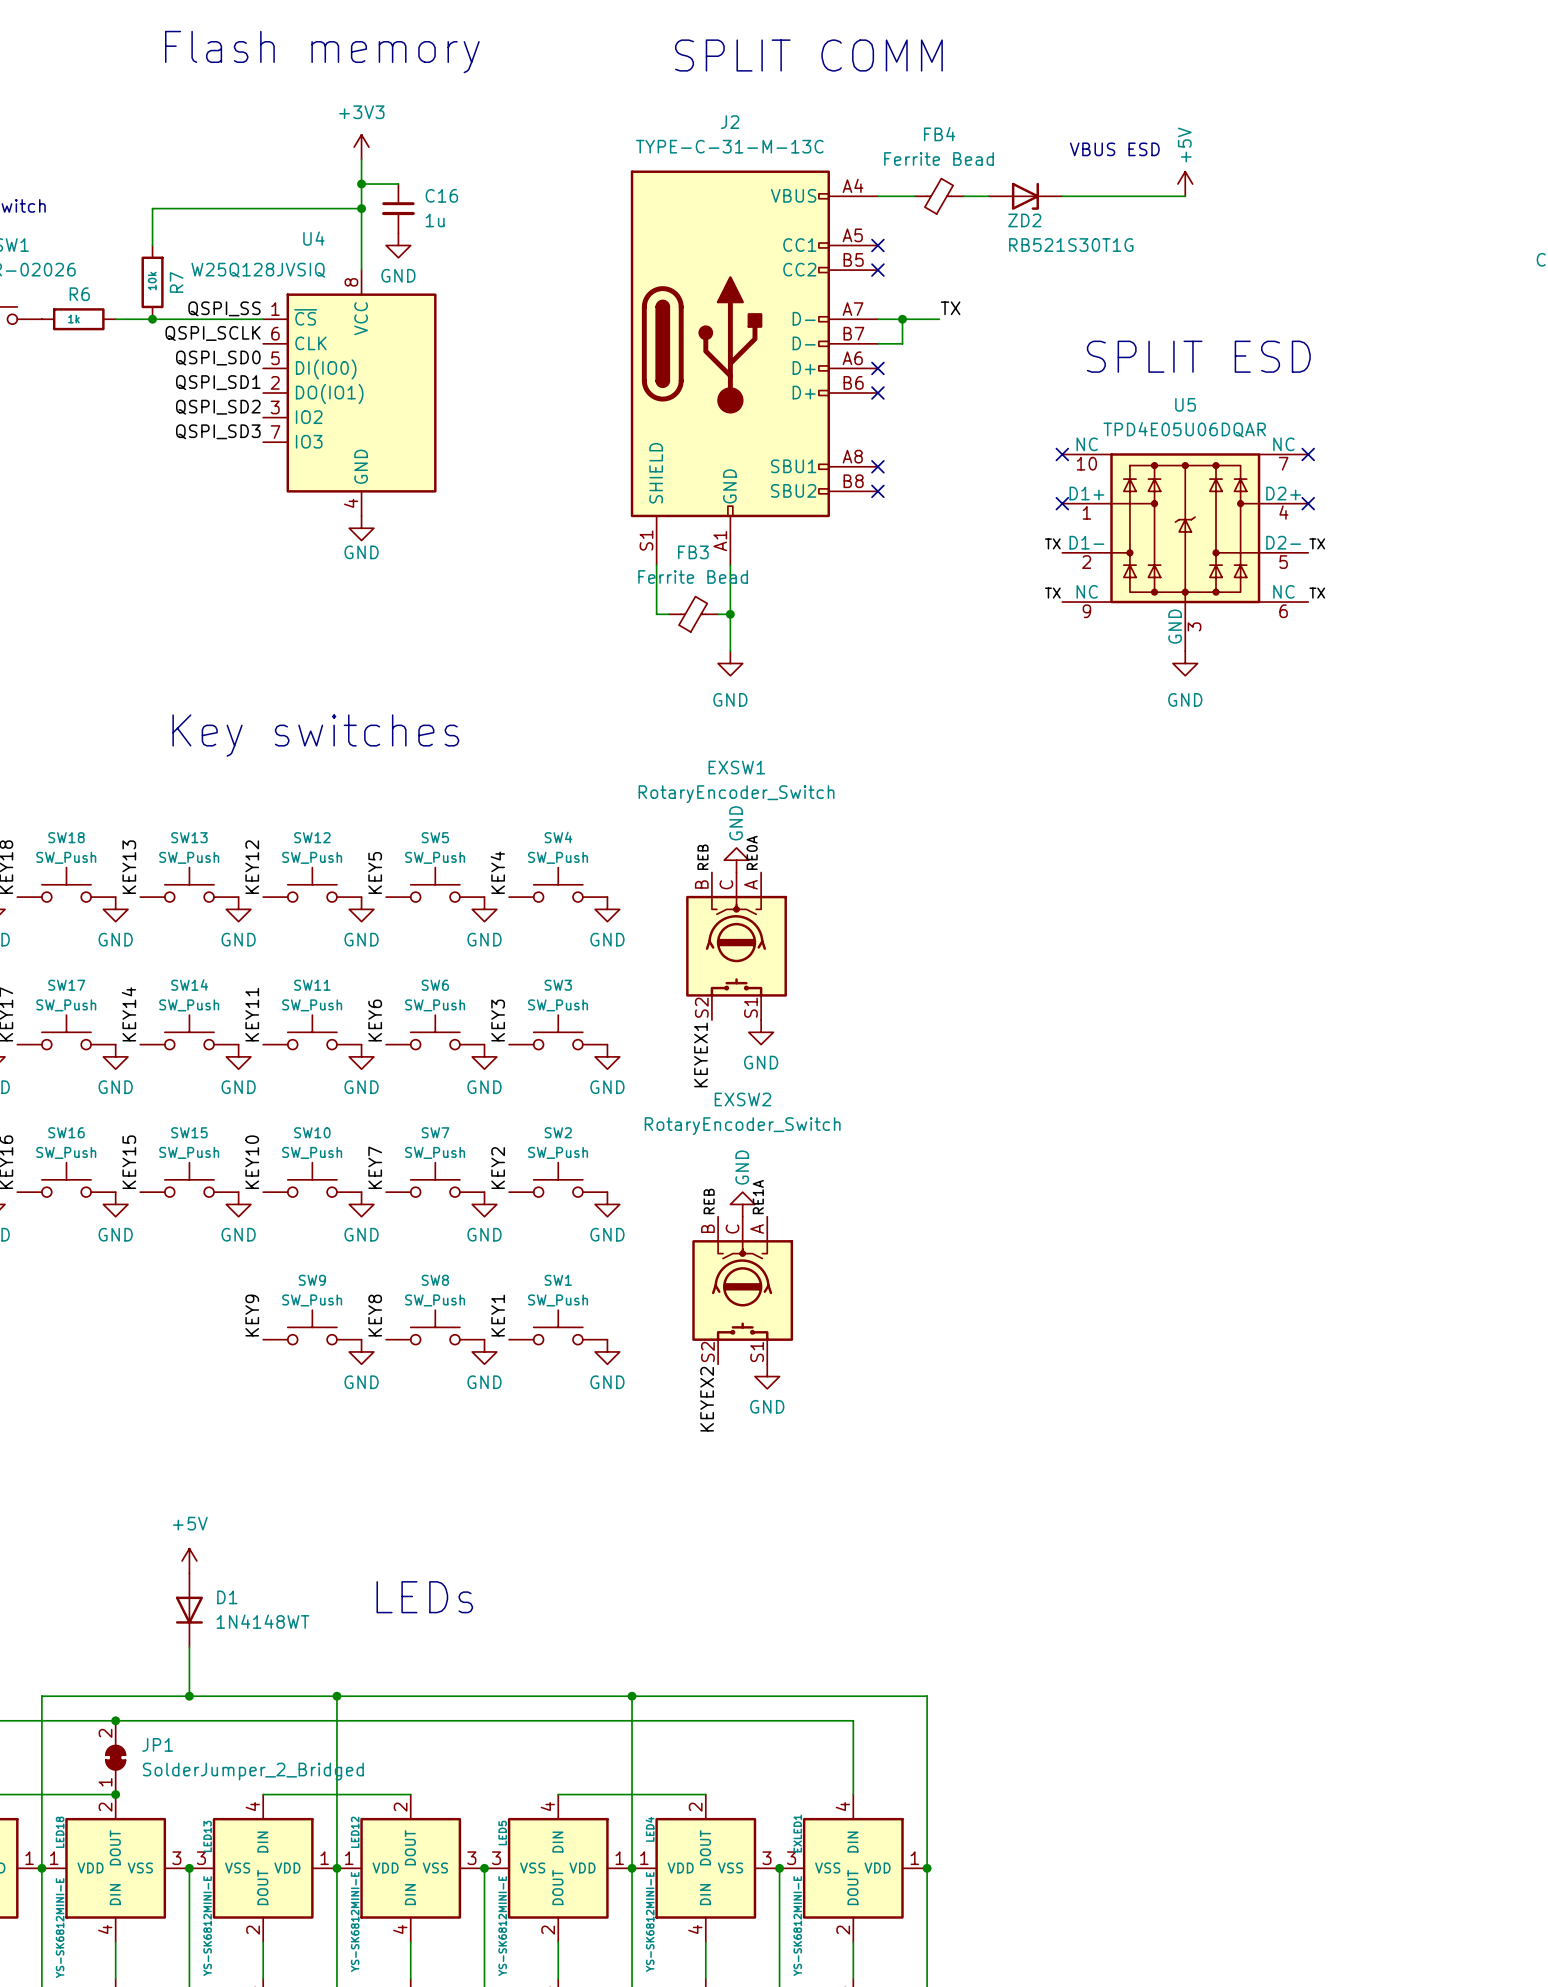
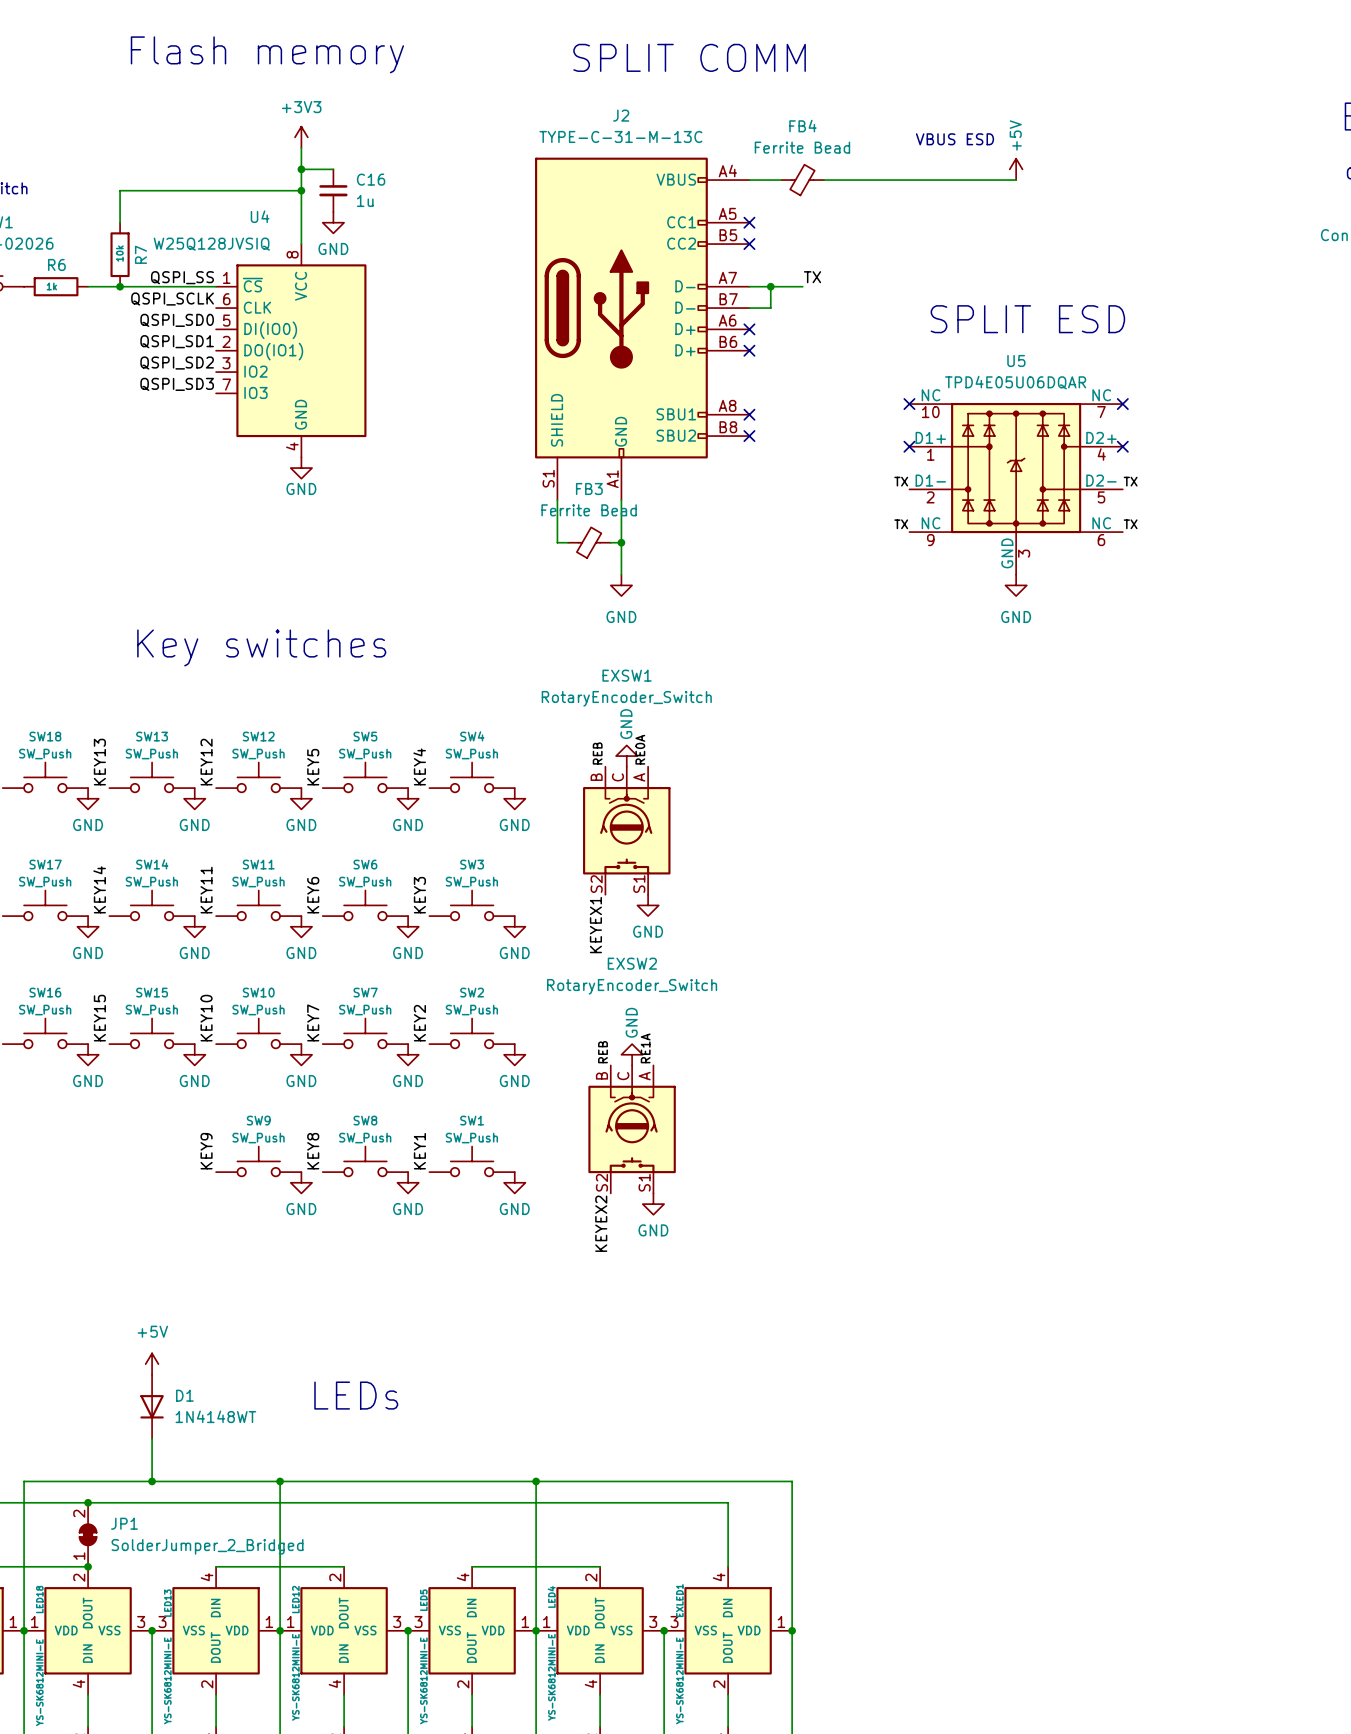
ZD2: RB521S30T1G (1025, 196) -> none

